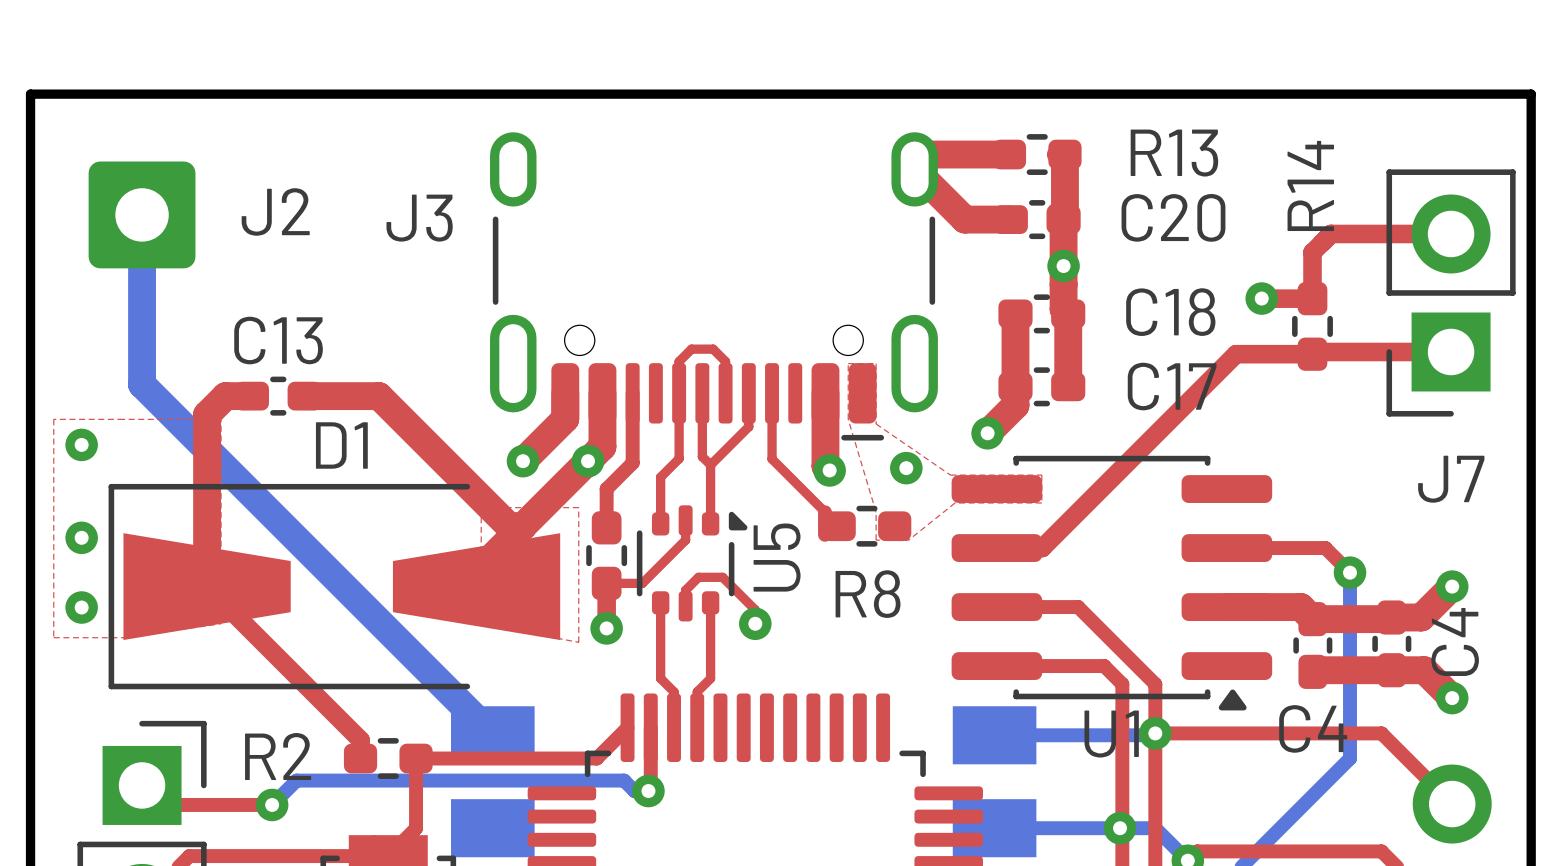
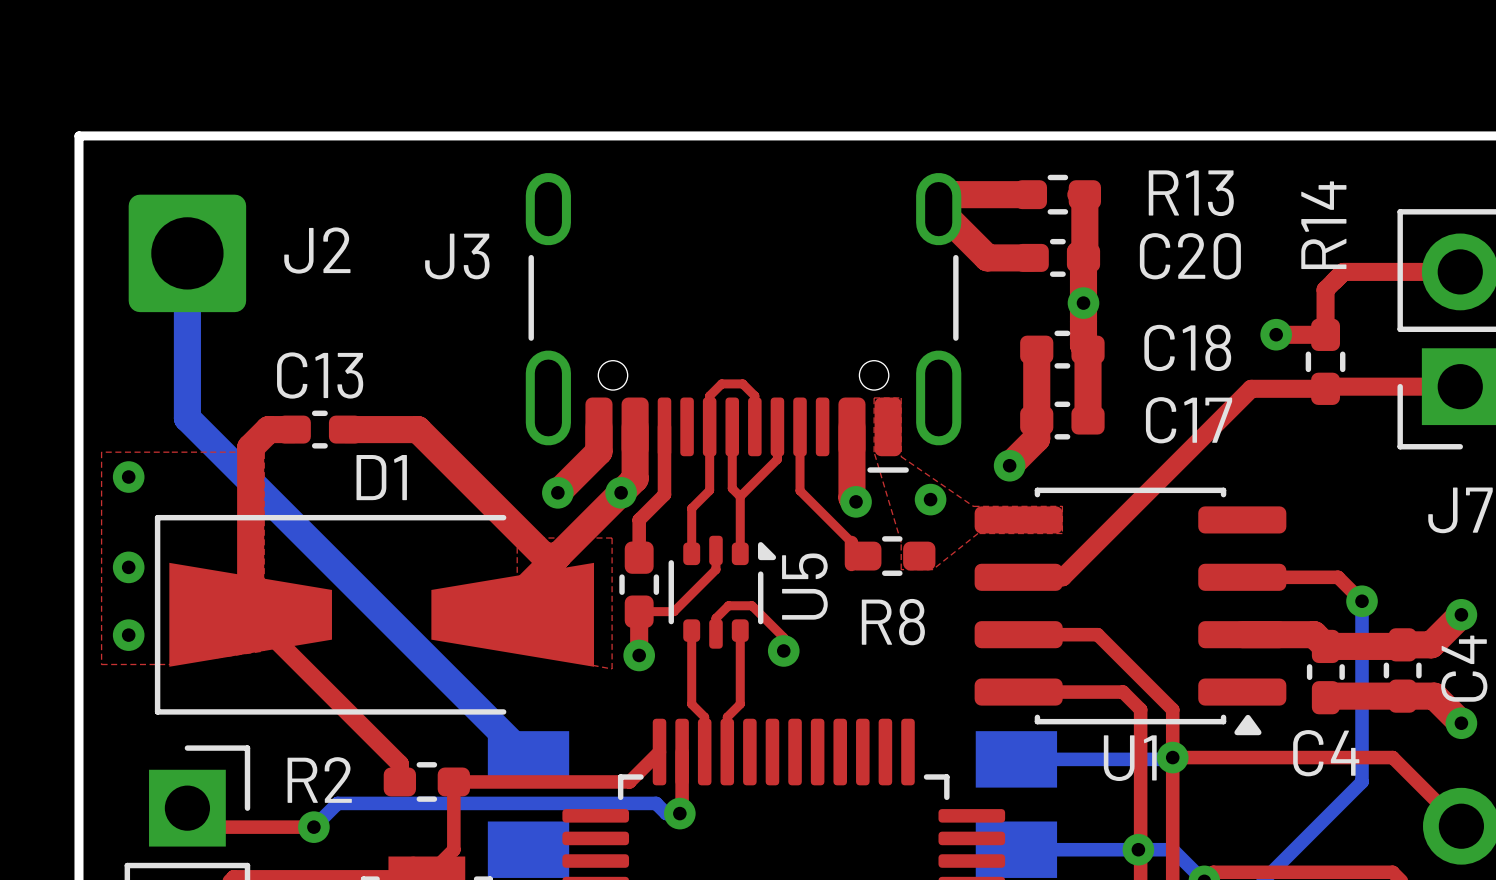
J2 footprint: [88, 161, 196, 269] -> [128, 194, 247, 313]

